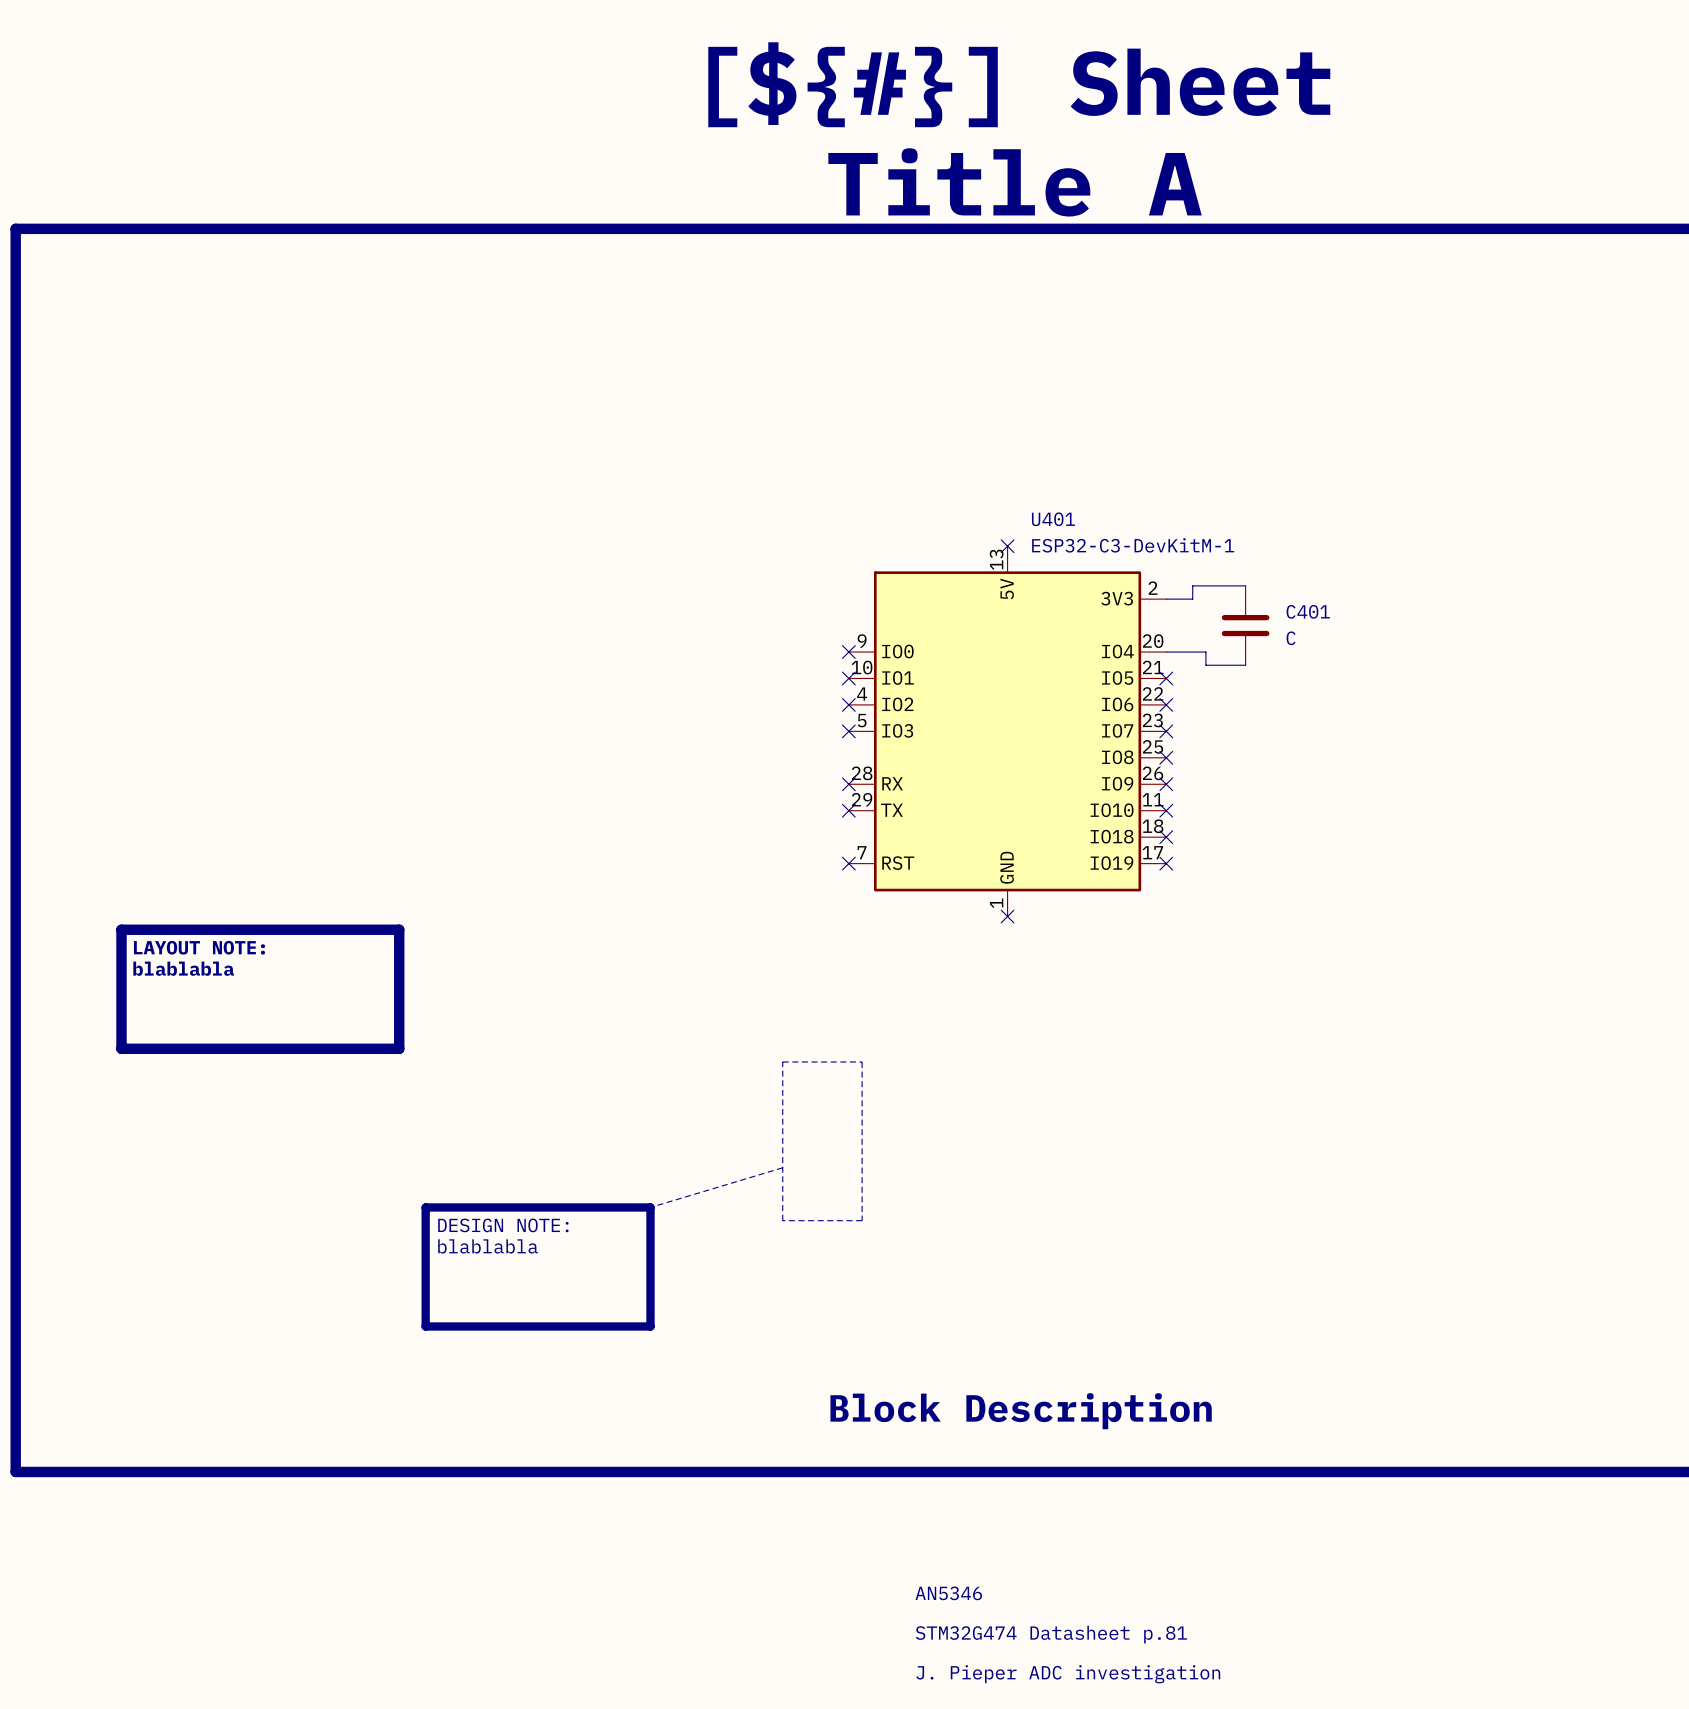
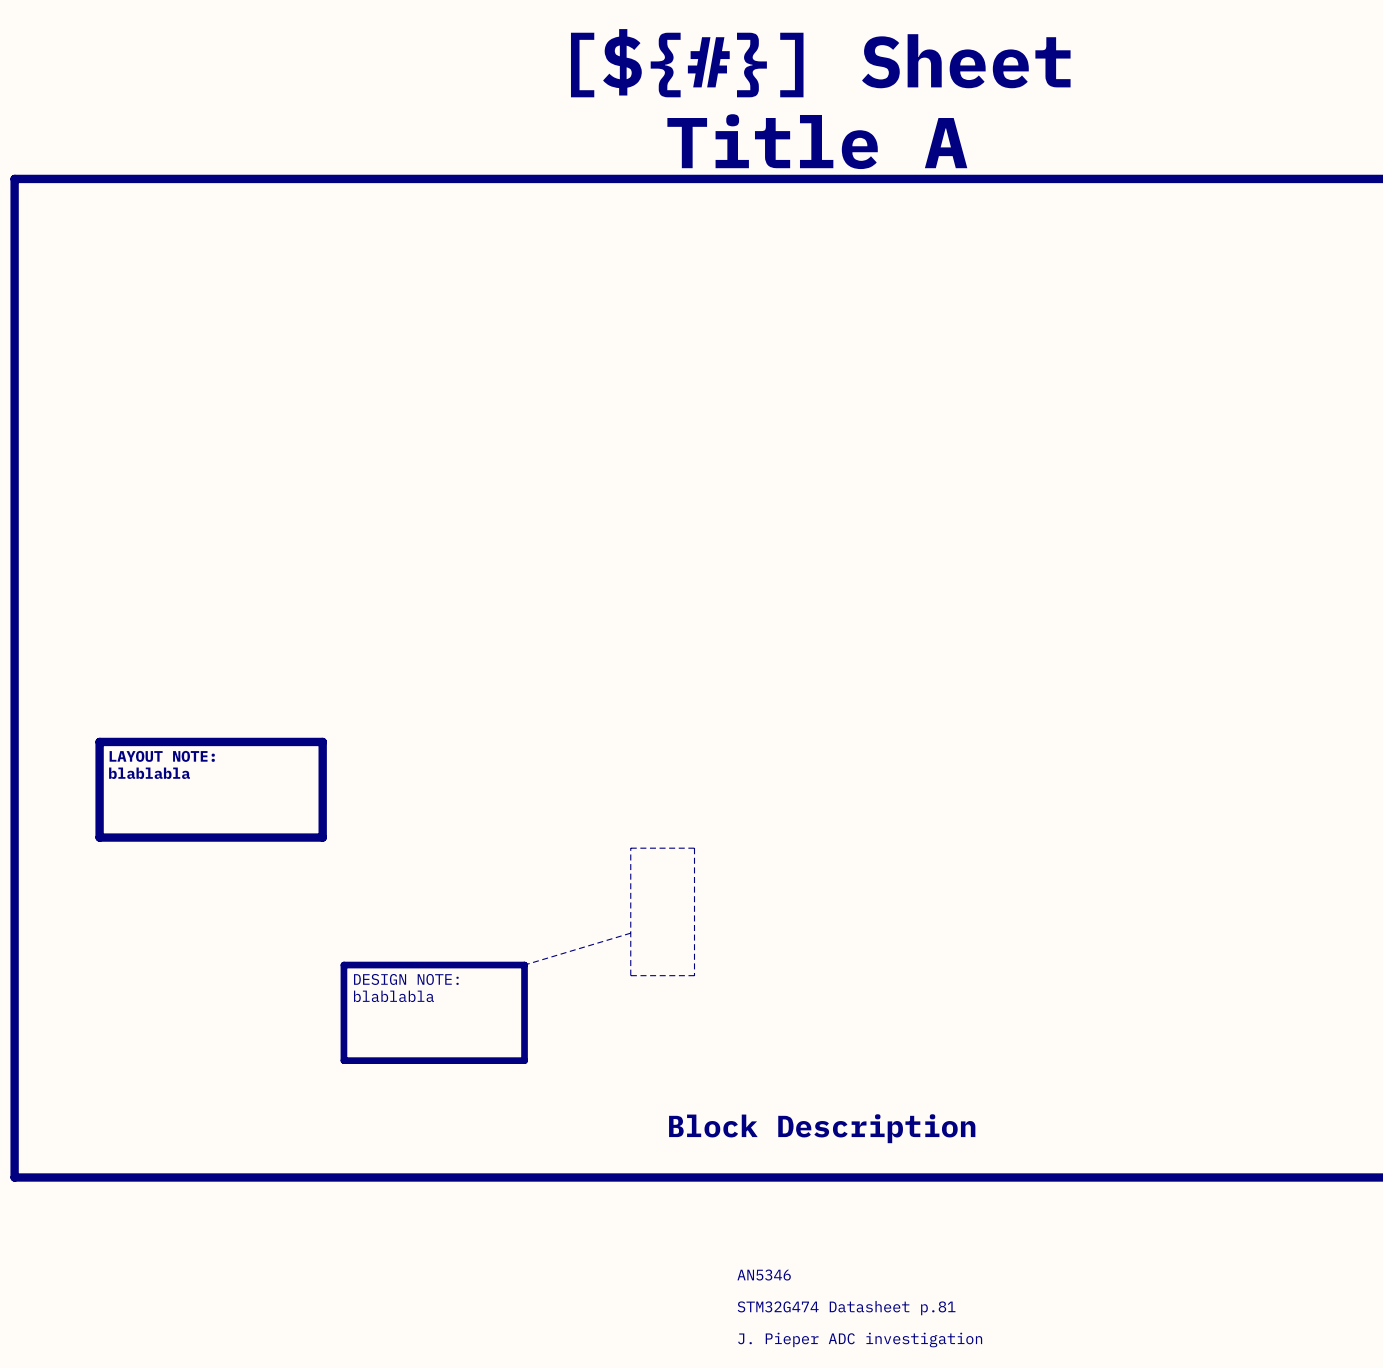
no-connect mark: (1007, 546) -> none
wire: (1245, 585) (1192, 585) (1192, 599) (1166, 599) -> none
C401: C (1245, 625) -> none
no-connect mark: (848, 652) -> none
wire: (1166, 652) (1205, 652) (1205, 665) (1245, 665) -> none
no-connect mark: (848, 678) -> none
no-connect mark: (1166, 678) -> none
no-connect mark: (848, 704) -> none
no-connect mark: (1166, 704) -> none
no-connect mark: (848, 731) -> none
U401: ESP32-C3-DevKitM-1 (1007, 731) -> none
no-connect mark: (1166, 731) -> none
no-connect mark: (1166, 757) -> none
no-connect mark: (848, 784) -> none
no-connect mark: (1166, 784) -> none
no-connect mark: (848, 810) -> none
no-connect mark: (1166, 810) -> none
no-connect mark: (1166, 837) -> none
no-connect mark: (848, 863) -> none
no-connect mark: (1166, 863) -> none
no-connect mark: (1007, 916) -> none

